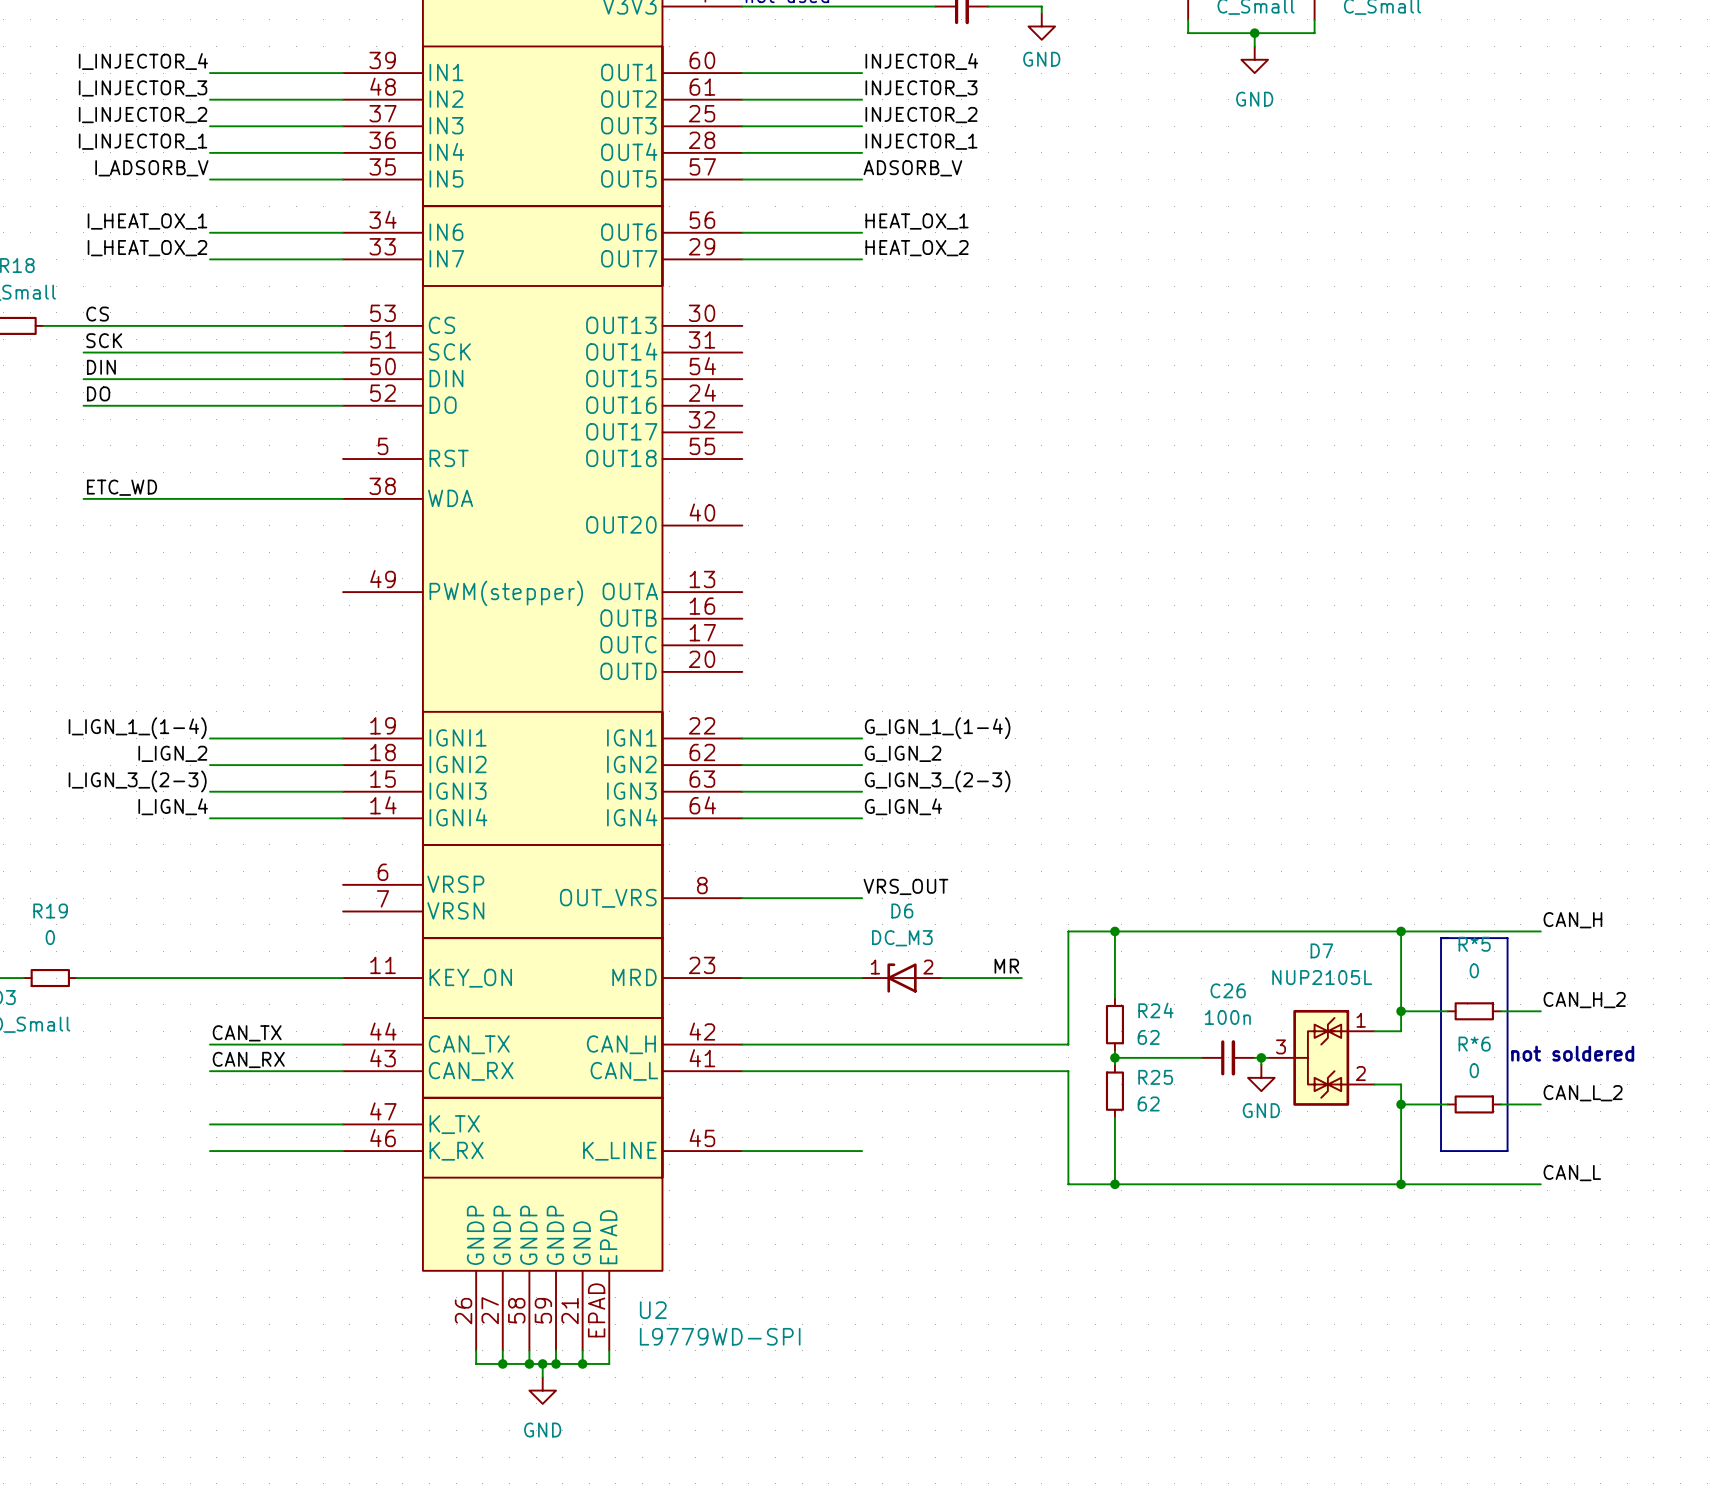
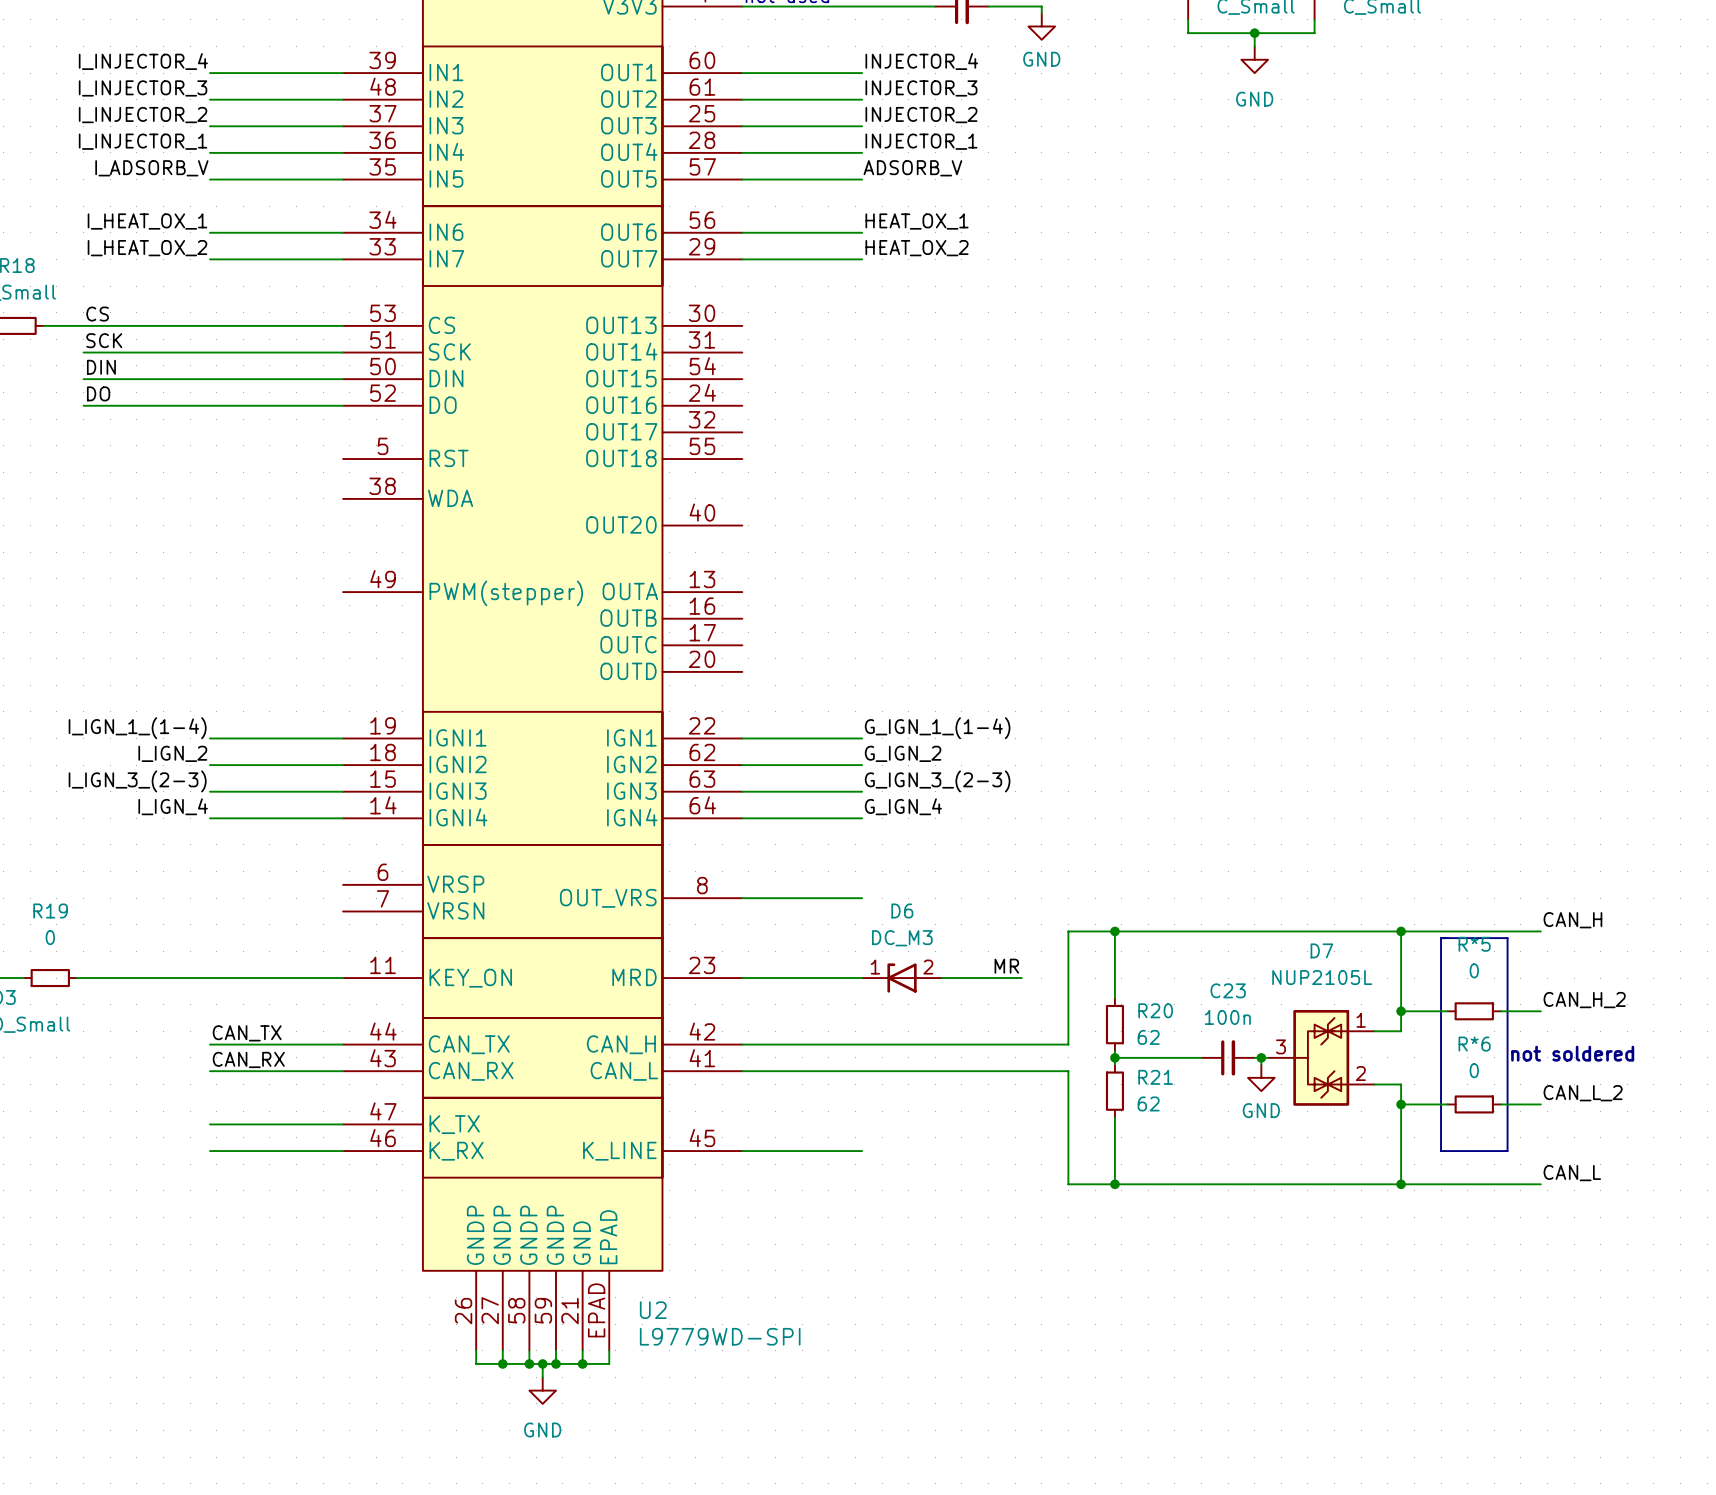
label: ETC_WD (122, 487) -> none
wire: (83, 498) (343, 498) -> none
label: VRS_OUT (905, 886) -> none
C26 name: C26 (1228, 990) -> C23 (1228, 990)
R24 name: R24 (1155, 1010) -> R20 (1155, 1010)
R25 name: R25 (1155, 1077) -> R21 (1155, 1077)

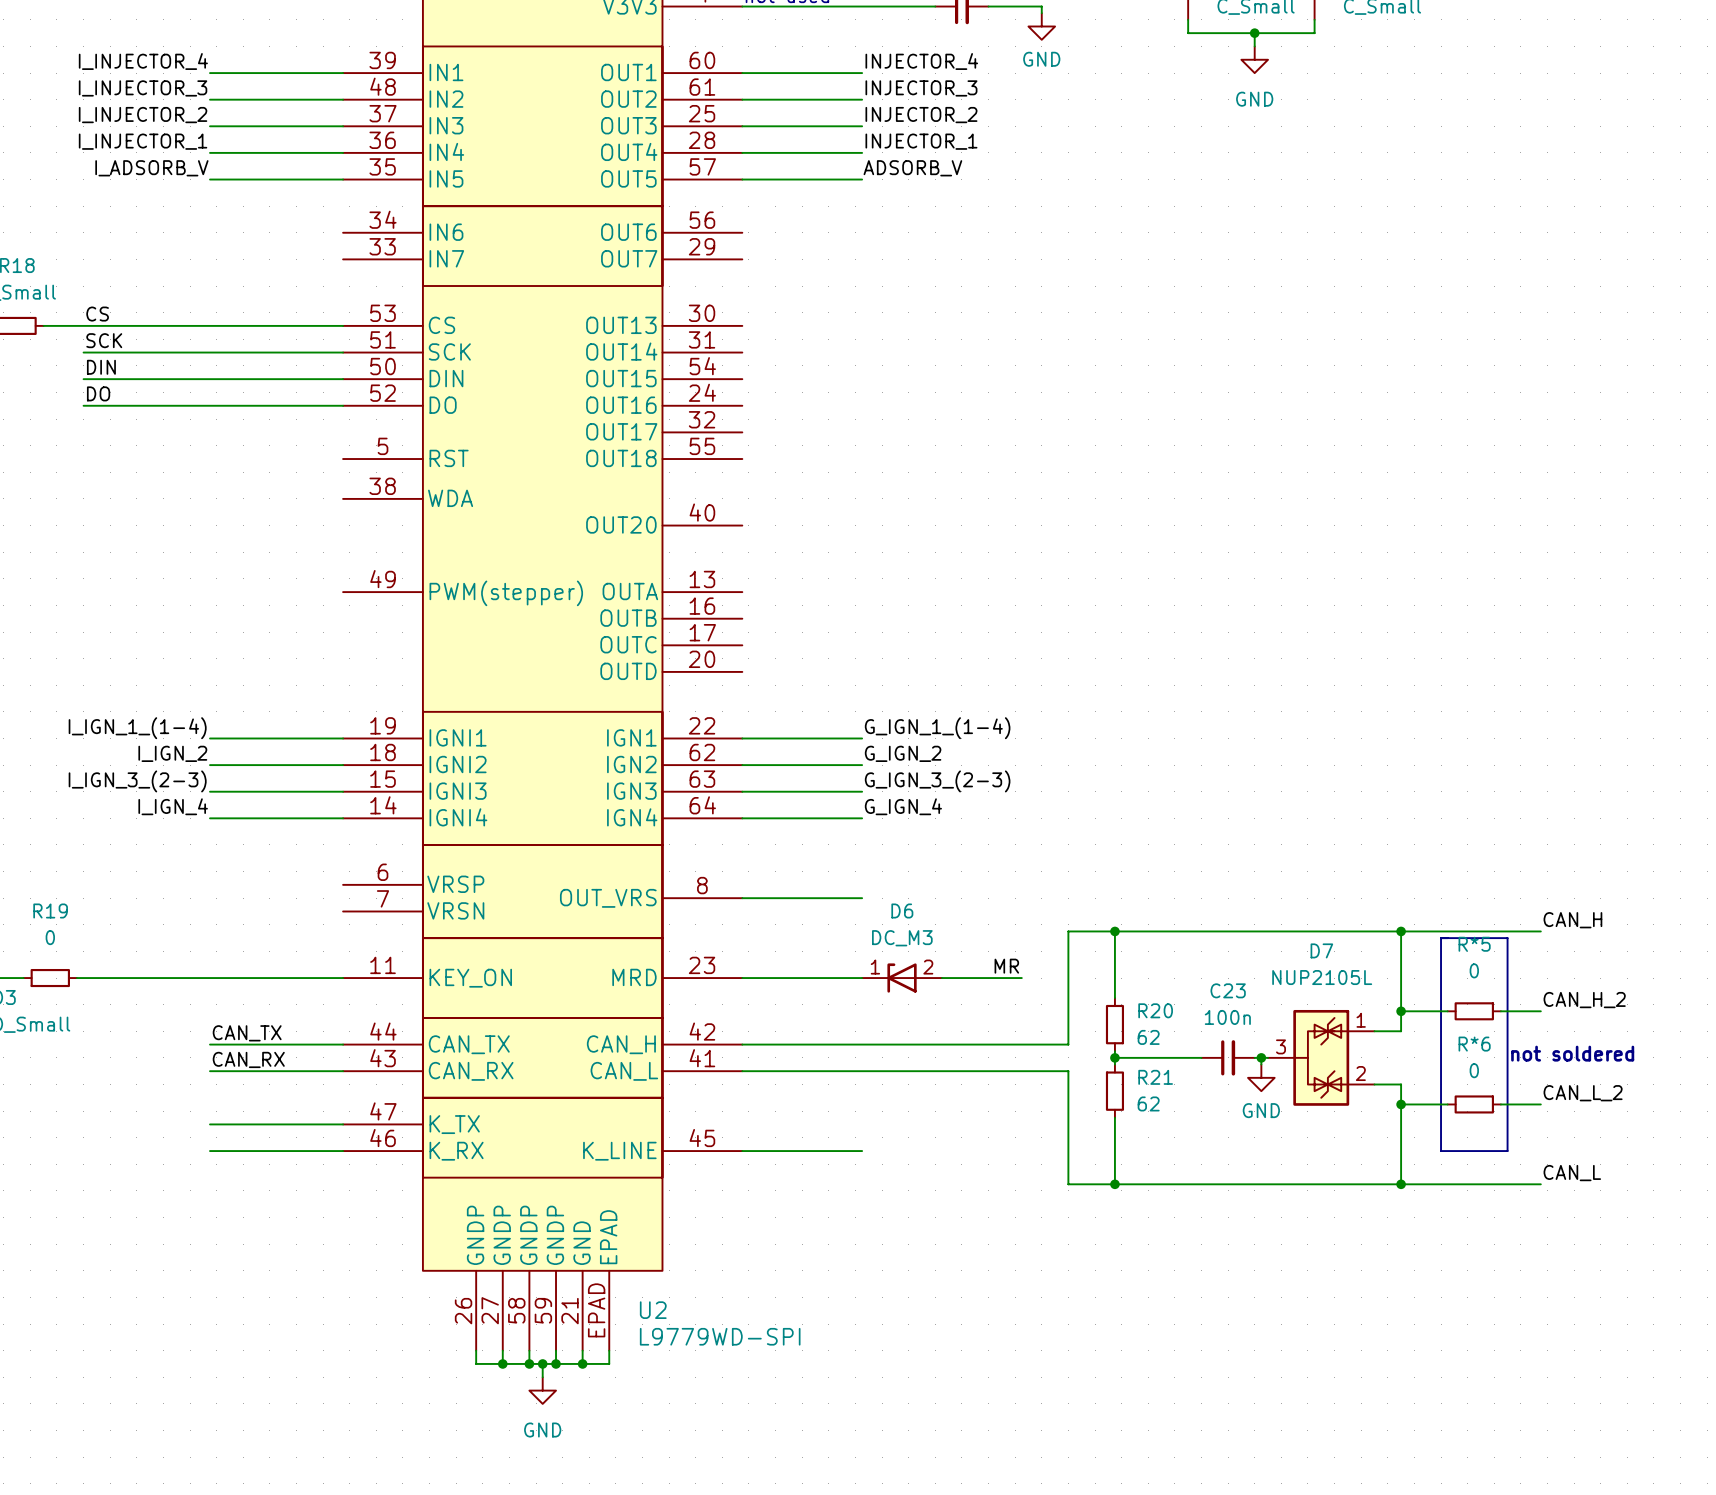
label: I_HEAT_OX_1 (147, 221) -> none
label: HEAT_OX_1 (917, 221) -> none
wire: (210, 232) (343, 232) -> none
wire: (742, 232) (862, 232) -> none
label: I_HEAT_OX_2 (147, 248) -> none
label: HEAT_OX_2 (917, 248) -> none
wire: (210, 259) (343, 259) -> none
wire: (742, 259) (862, 259) -> none

